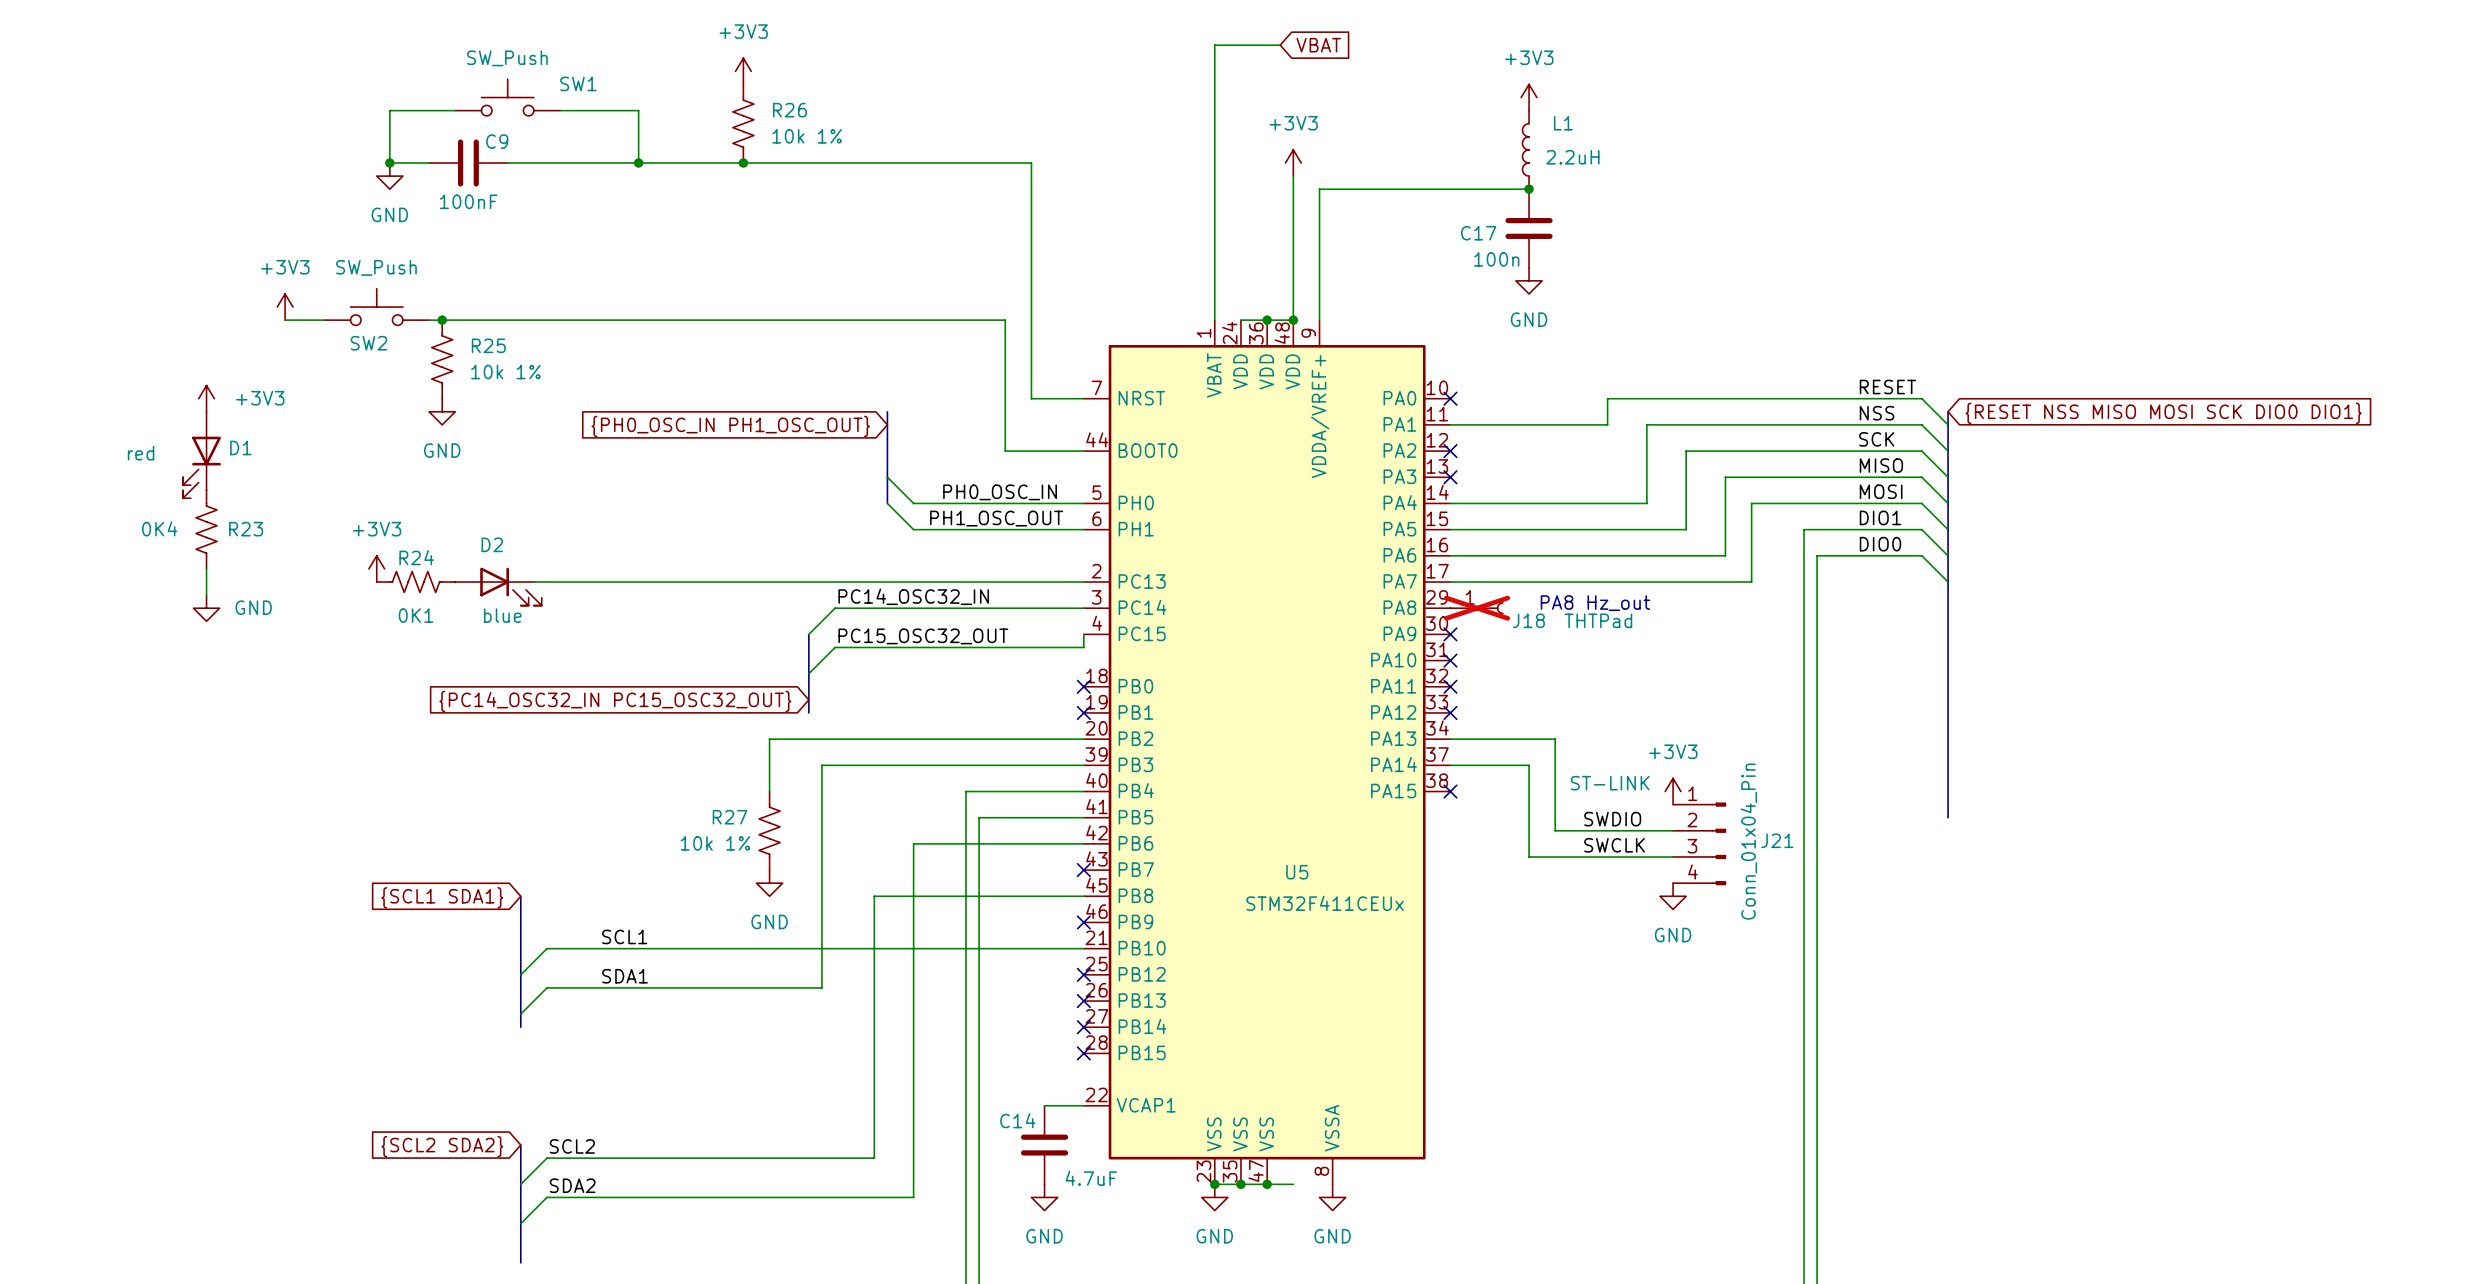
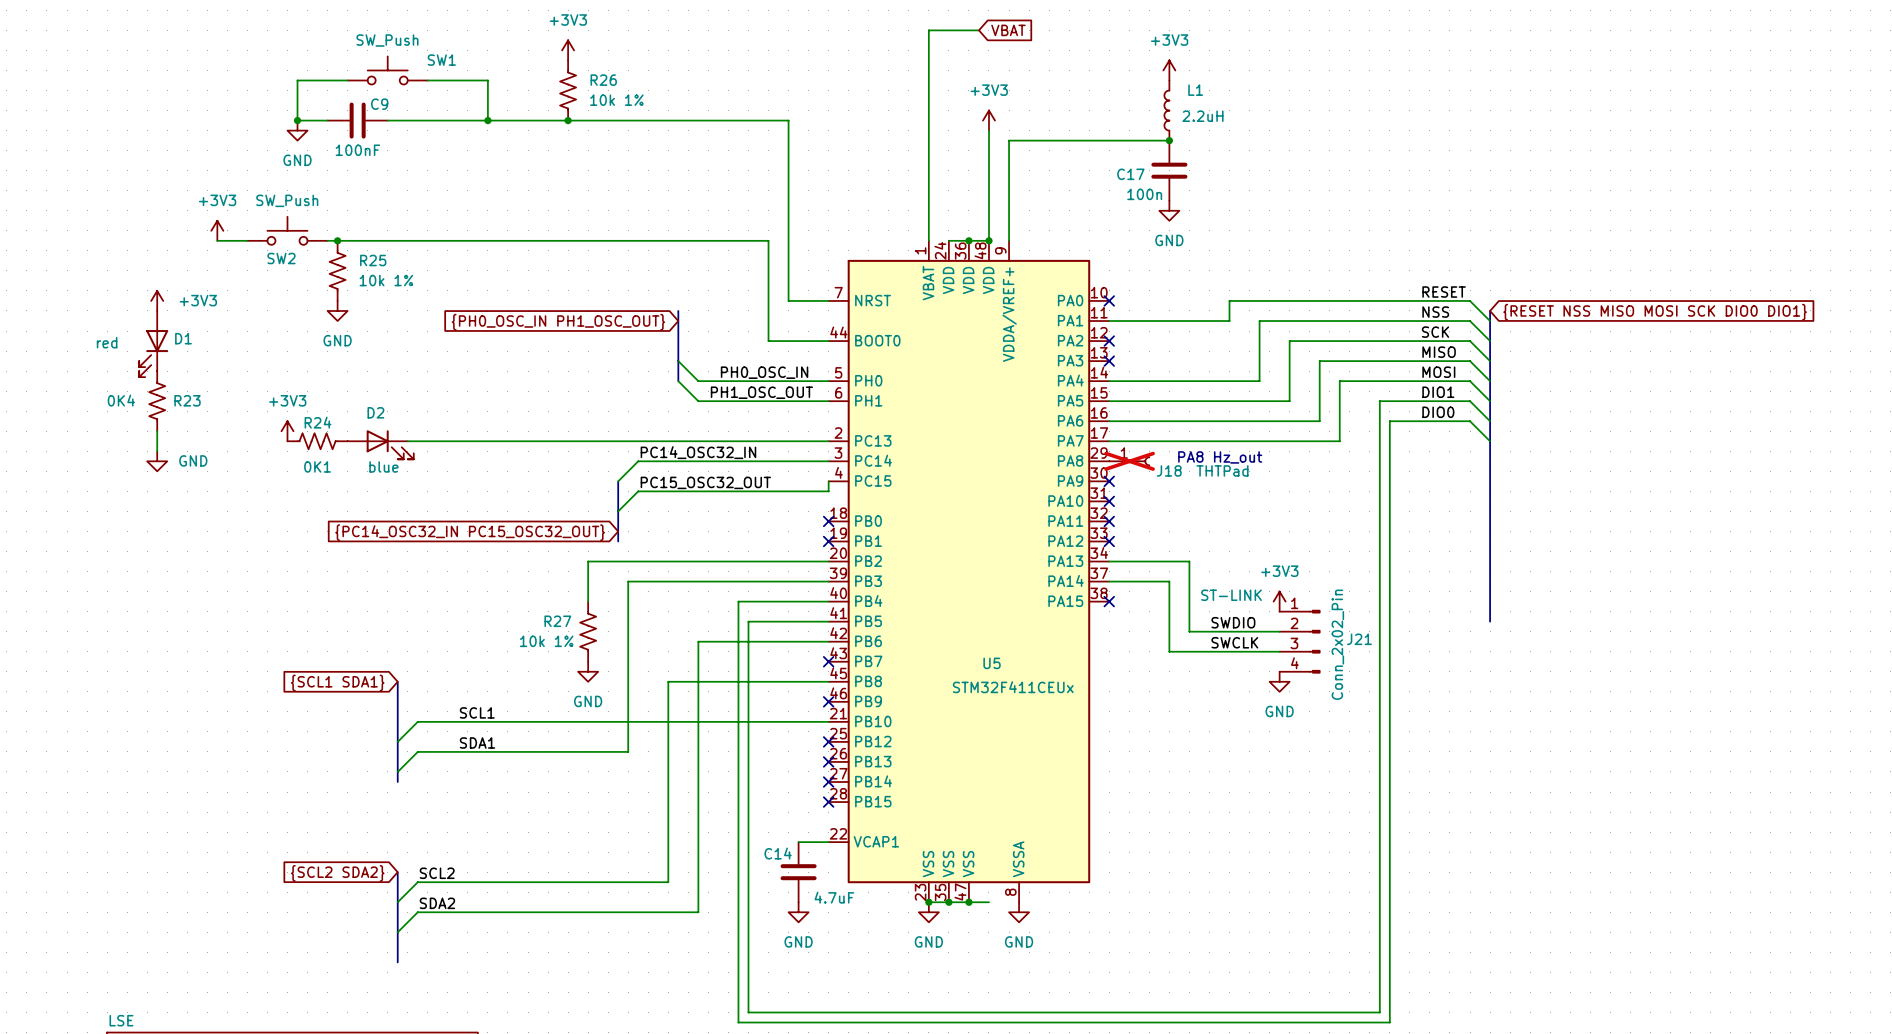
J21 value: Conn_01x04_Pin (1748, 841) -> Conn_2x02_Pin (1337, 644)

